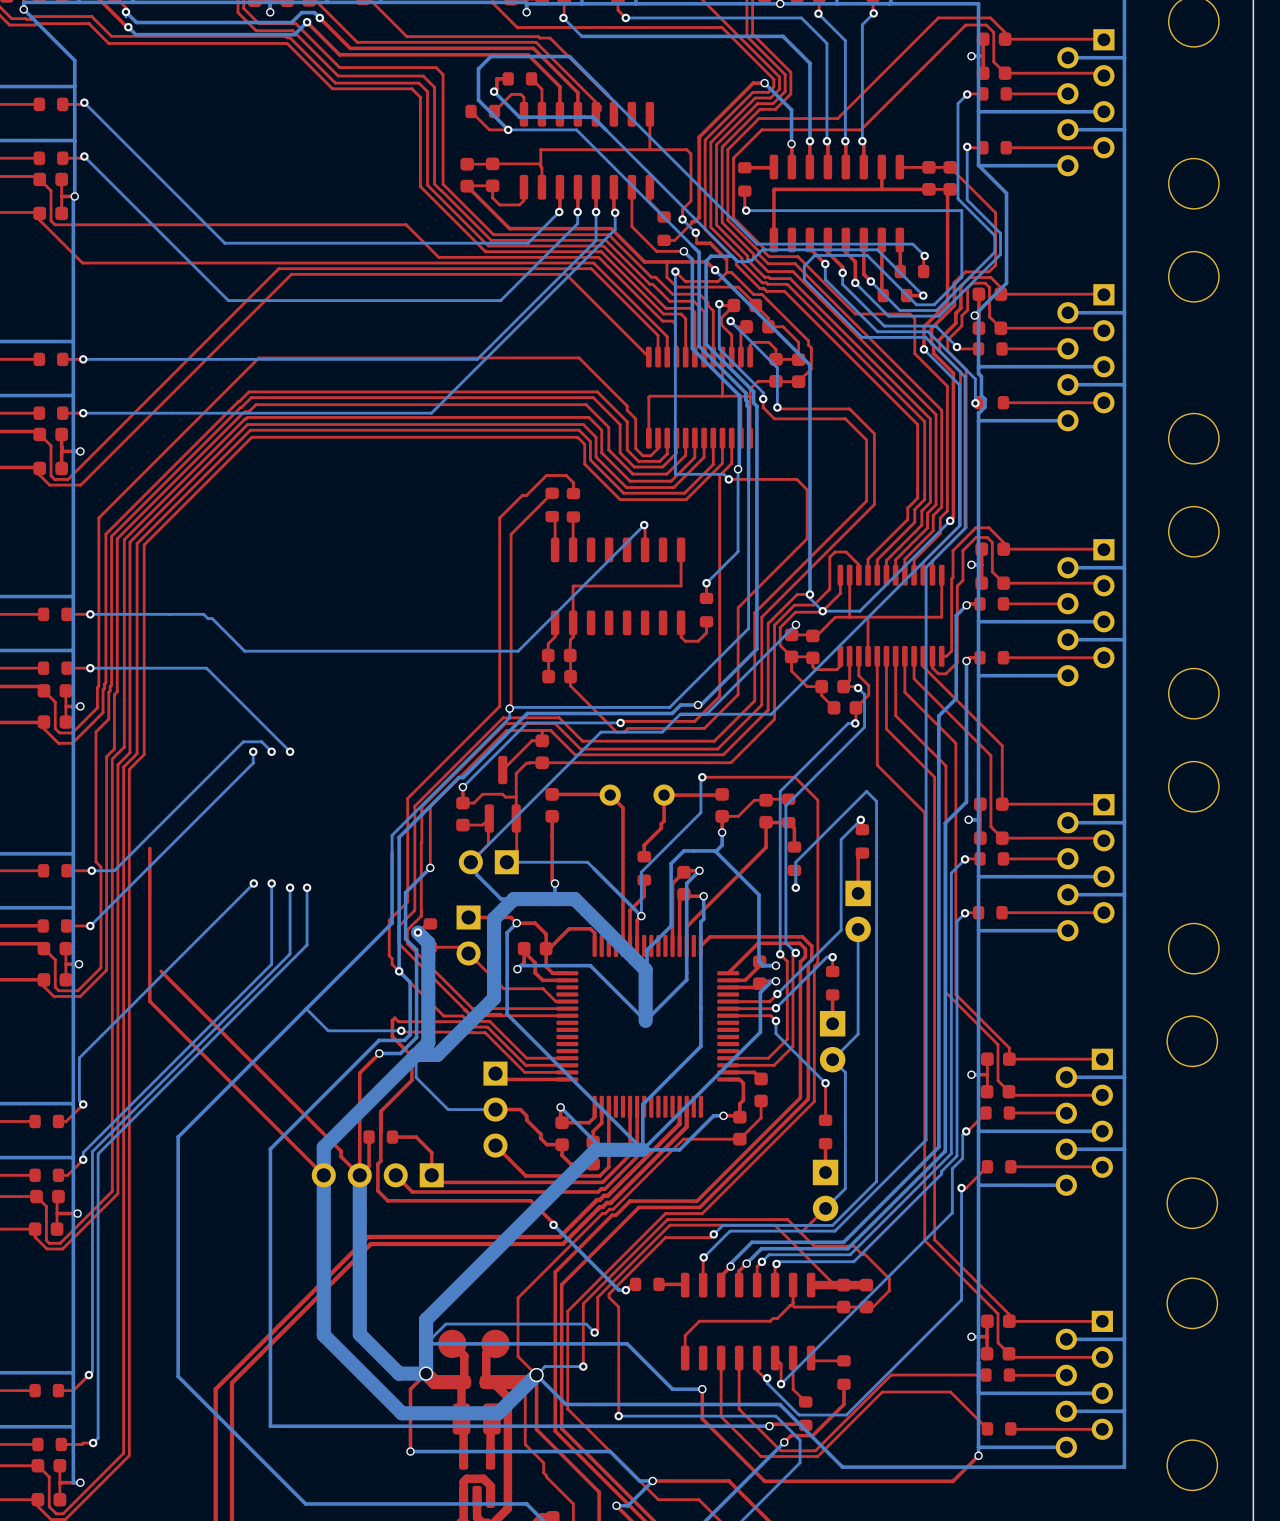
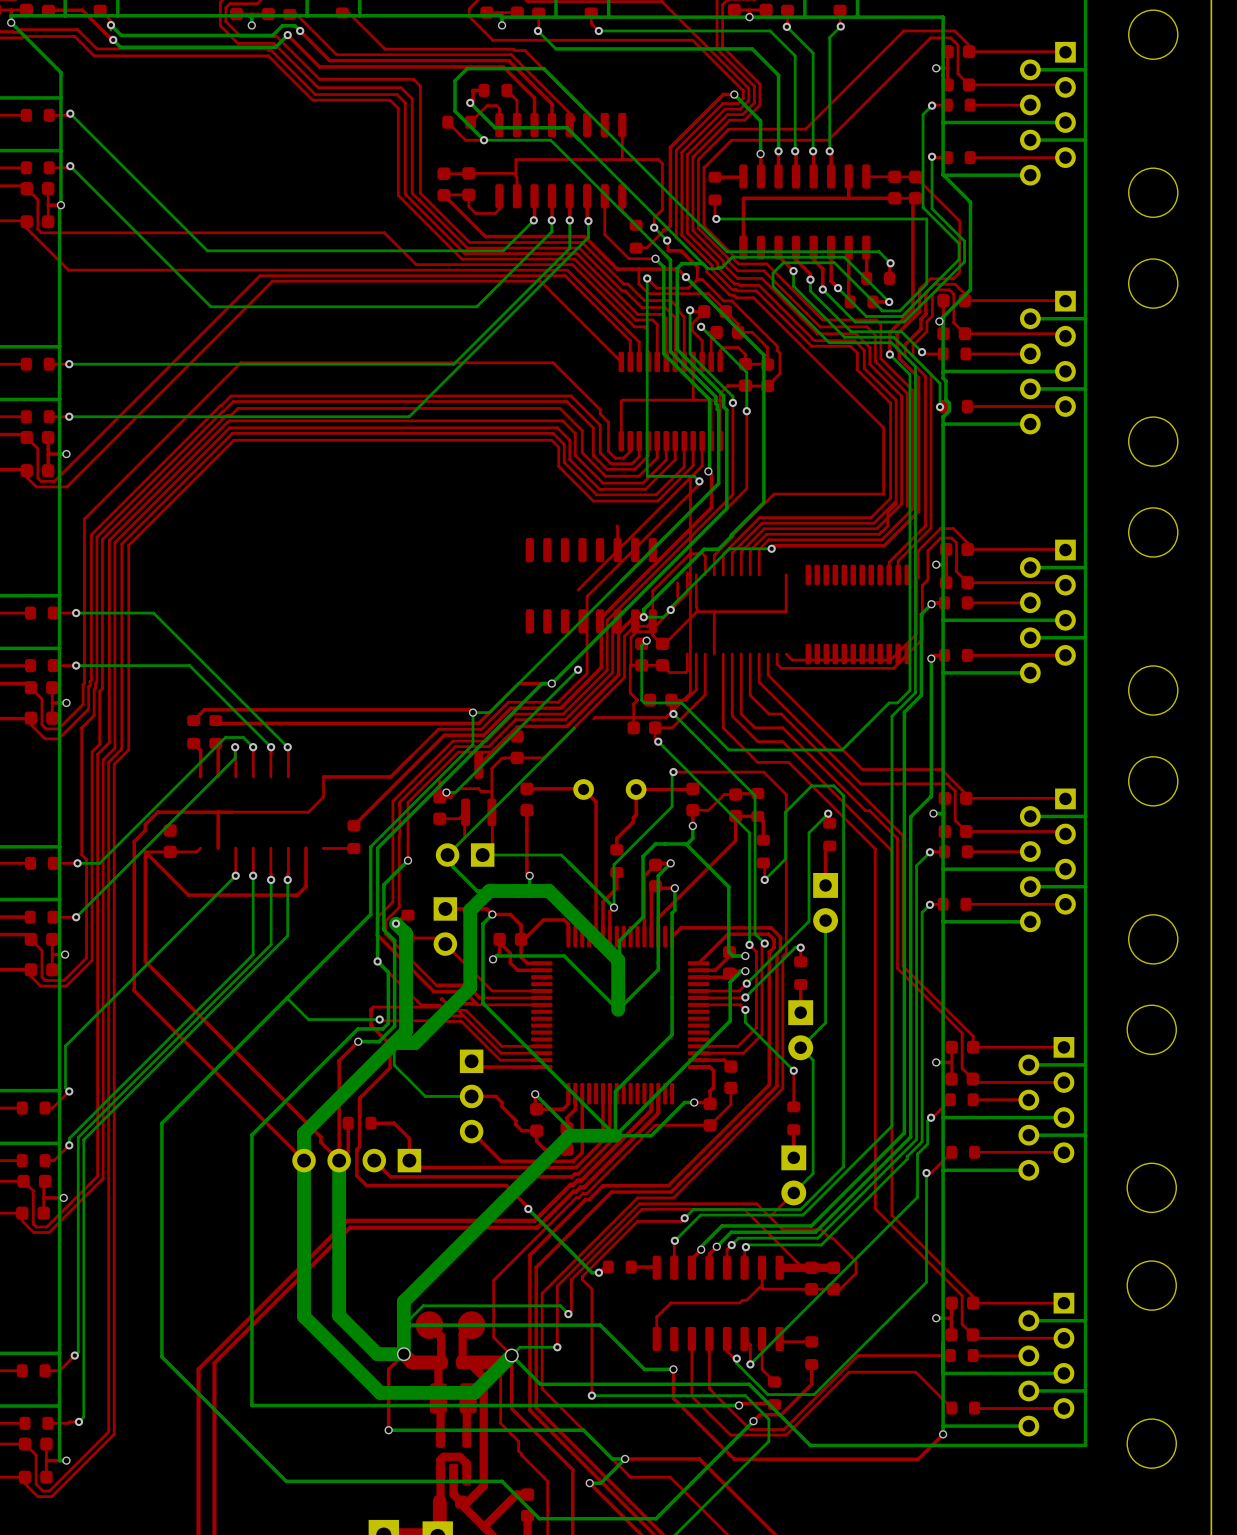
top track: (852, 321) (941, 410) -> (820, 326) (867, 326) (875, 335) (875, 361) (907, 393) (907, 413)
top track: (849, 328) (936, 414) -> (817, 333) (856, 333) (869, 347) (869, 364) (901, 395) (901, 418)
top track: (846, 335) (930, 418) -> (814, 340) (854, 340) (864, 350) (864, 368) (896, 400) (896, 422)
top track: (843, 340) (924, 421) -> (811, 346) (850, 346) (857, 353) (857, 369) (890, 402) (890, 425)
bottom track: (794, 349) (809, 365) (809, 598) (822, 611) (859, 611) (950, 520) -> (763, 355) (763, 502) (718, 549) (704, 549) (643, 609) (643, 617) (663, 617) (670, 607) (729, 548) (771, 548)
bottom track: (950, 361) (965, 376) (965, 528) (926, 567) (926, 720) -> (915, 366) (915, 692) (891, 716)
bottom track: (944, 369) (959, 384) (959, 526) (771, 714) (680, 714) (662, 732) (600, 732) -> (909, 374) (909, 690) (897, 702) (889, 702) (842, 749) (728, 749) (681, 702) (644, 702) (641, 700) (641, 645) (646, 640)
top track: (763, 407) (774, 418) (845, 418) (866, 440) (866, 501) (754, 612) (754, 700) (714, 741) (582, 741) (559, 717) -> (732, 411) (732, 494) (607, 620) (607, 670) (563, 714) (533, 714)
top track: (777, 407) (849, 408) (874, 433) (874, 504) (761, 617) (761, 705) (717, 749) (580, 749) (554, 723) -> (746, 411) (746, 488) (612, 622) (612, 672) (565, 719) (529, 719)
top track: none -> (708, 471) (711, 474) (711, 507) (601, 617) (601, 667) (560, 708) (511, 708) (484, 735) (444, 735) (353, 825)
bottom track: (738, 469) (738, 551) (706, 583) -> none
top track: (728, 479) (796, 479) (807, 489) (807, 538) (738, 607) (738, 694) (734, 697) -> (705, 654) (705, 694)
top track: none -> (702, 481) (587, 596) (587, 673) (558, 702) (508, 702) (481, 729) (438, 729) (390, 776) (323, 776) (323, 797) (308, 812) (231, 812)
bottom track: (748, 481) (748, 628) (669, 707) (510, 707) (509, 717) (392, 835) (392, 853) -> (718, 483) (489, 712) (473, 712) (473, 744) (370, 846)
top track: (917, 492) (917, 498) (907, 508) (907, 519) (868, 559) (868, 575) -> (883, 494) (773, 494) (714, 555) (714, 574)
top track: (552, 493) (511, 534) (509, 708) -> none
top track: (573, 493) (573, 482) (566, 475) (546, 475) (526, 495) (522, 495) (499, 518) (499, 706) (407, 798) (407, 901) (389, 920) (389, 955) (392, 958) (392, 964) (399, 971) -> none
top track: (924, 496) (924, 499) (914, 509) (914, 522) (877, 559) (877, 575) -> (890, 498) (871, 517) (759, 517) (723, 554) (723, 574)
top track: none -> (896, 501) (873, 523) (761, 523) (732, 552) (732, 574)
top track: (936, 502) (927, 513) (927, 527) (895, 559) (895, 575) -> (901, 503) (876, 528) (764, 528) (741, 551) (741, 574)
part: (552, 504) -> none
part: (573, 505) -> none
top track: (941, 505) (933, 515) (933, 530) (904, 559) (904, 575) -> none
bottom track: (756, 507) (756, 649) (700, 705) (680, 705) (672, 713) (527, 713) (463, 777) (458, 777) (399, 837) (399, 855) -> (726, 508) (551, 683) (542, 683) (377, 848)
top track: (947, 507) (947, 510) (940, 518) (940, 533) (914, 559) (914, 575) -> (912, 508) (881, 539) (768, 539) (759, 549) (759, 574)
top track: (953, 510) (953, 517) (950, 520) -> (918, 511) (884, 545) (774, 545) (771, 548)
top track: (552, 516) (555, 519) (555, 549) -> none
top track: (573, 516) (573, 549) -> none
via: (950, 520) -> none
bottom track: (644, 525) (518, 651) (244, 651) (212, 618) (207, 618) (203, 614) (169, 614) -> (287, 747) (153, 613)
via: (644, 525) -> none
top track: (916, 530) (886, 560) (886, 575) -> (882, 531) (879, 534) (766, 534) (750, 550) (750, 574)
via: none -> (771, 548)
top track: (681, 549) (681, 586) (573, 586) (570, 685) (616, 732) (624, 732) (628, 728) (704, 728) -> (658, 741) (655, 738) (655, 727) (672, 727) (675, 724)
top track: none -> (687, 572) (687, 593) (649, 631) (636, 631) (630, 637) (630, 665)
top track: none -> (696, 574) (696, 611)
top track: none -> (786, 574) (785, 611) (696, 611)
top track: (840, 575) (840, 593) (821, 612) (795, 612) (780, 627) (780, 645) (791, 656) -> none
top track: (849, 575) (849, 617) -> none
top track: (858, 575) (858, 564) (846, 552) (834, 552) (829, 557) (829, 589) (813, 605) (794, 605) (774, 625) (774, 719) (730, 762) (569, 762) -> (705, 574) (705, 556) (702, 553) (690, 553) (652, 590) (652, 620) (647, 626) (634, 626) (624, 636) (624, 677) (543, 757)
top track: (941, 575) (941, 617) (835, 617) (816, 635) (791, 634) (791, 629) (795, 624) -> none
via: (706, 583) -> none
top track: (809, 594) (797, 594) (768, 623) (768, 709) (723, 754) (575, 754) (550, 730) -> (643, 617) (637, 613) (618, 632) (618, 674) (566, 726) (525, 726)
via: (809, 594) -> none
part: (706, 610) -> none
via: none -> (670, 609)
via: (822, 611) -> none
top track: none -> (714, 611) (714, 654)
top track: (868, 617) (868, 656) -> none
via: none -> (643, 617)
top track: (706, 621) (706, 632) -> (696, 611) (677, 631)
top track: (555, 622) (555, 636) (548, 643) (548, 676) -> none
bottom track: (795, 624) (706, 714) -> none
via: (795, 624) -> none
top track: (951, 635) (951, 651) (946, 656) (941, 656) -> (916, 633) (890, 660) (792, 660) (786, 654)
top track: (957, 641) (957, 662) (945, 673) (938, 673) (932, 667) (932, 656) -> (922, 639) (893, 668) (781, 668) (777, 664) (777, 654)
via: none -> (646, 640)
part: (791, 645) -> none
part: (812, 646) -> none
part: (559, 655) -> none
part: none -> (641, 654)
part: none -> (662, 654)
top track: none -> (687, 654) (685, 672) (669, 672) (662, 665) (630, 665)
top track: none -> (696, 654) (696, 689) (685, 700) (671, 700) (671, 711) (673, 713)
top track: (791, 656) (791, 671) (807, 686) (821, 686) (821, 695) (834, 707) -> none
top track: (840, 656) (840, 666) (836, 669) (815, 669) (812, 666) (811, 656) (791, 656) -> none
top track: (849, 656) (849, 680) (843, 686) (858, 688) -> none
top track: (858, 656) (858, 675) (868, 685) (868, 695) (856, 707) (855, 723) -> none
top track: (877, 656) (877, 765) (924, 812) (924, 1240) -> (723, 654) (723, 727) (757, 762) (788, 762) (875, 849) (875, 1208) (890, 1224)
top track: (886, 656) (886, 729) (934, 777) (934, 1239) -> (732, 654) (732, 716) (757, 741) (782, 741) (891, 850) (891, 1215) (900, 1223)
top track: (895, 656) (895, 715) (945, 765) (945, 992) -> (741, 654) (741, 713) (755, 727) (782, 727) (865, 810) (869, 810) (897, 838) (897, 968) (911, 982)
top track: (904, 656) (904, 692) (955, 743) (955, 994) -> (750, 654) (750, 695) (768, 713) (781, 713) (903, 835) (903, 966) (920, 984)
top track: (914, 656) (914, 678) (990, 755) (990, 796) -> (759, 654) (759, 682) (860, 783) (947, 783) (955, 791)
top track: (923, 656) (923, 666) (1002, 745) (1002, 800) -> (768, 654) (768, 675) (862, 769) (941, 769) (966, 794)
top track: none -> (630, 665) (630, 692) (637, 700) (633, 704) (633, 727)
bottom track: none -> (578, 669) (455, 792) (446, 792)
via: none -> (578, 669)
part: (559, 676) -> none
top track: none -> (551, 683) (518, 683) (478, 723) (218, 723) (215, 720)
via: none -> (551, 683)
part: (832, 686) -> none
bottom track: (858, 688) (864, 694) (864, 727) (785, 805) -> (673, 713) (755, 795) (755, 799)
via: (858, 688) -> none
part: none -> (660, 700)
via: (698, 705) -> none
part: (845, 707) -> none
via position: (509, 708) -> (473, 712)
top track: none -> (473, 712) (470, 709) (204, 709) (193, 720)
top track: (538, 717) (503, 717) (414, 807) -> (513, 714) (486, 741) (453, 741) (392, 801)
via: none -> (673, 713)
bottom track: (620, 722) (527, 722) (462, 787) -> none
via: (620, 722) -> none
top track: (540, 723) (505, 723) (421, 808) -> (515, 719) (488, 746) (455, 746) (399, 802)
bottom track: (855, 723) (848, 723) (780, 791) (780, 839) -> (658, 741) (749, 832)
via: (855, 723) -> none
top track: (542, 730) (506, 730) (430, 808) -> (517, 726) (491, 752) (458, 752) (408, 802)
part: none -> (644, 727)
part: none -> (193, 731)
part: none -> (215, 731)
via: none -> (658, 741)
top track: none -> (193, 743) (200, 750) (200, 776)
top track: none -> (215, 743) (218, 745) (218, 776)
top track: none -> (253, 747) (253, 776)
top track: none -> (271, 747) (270, 776)
top track: none -> (287, 747) (288, 776)
via: none -> (287, 747)
top track: none -> (235, 750) (235, 776)
via position: (462, 787) -> (446, 792)
bottom track: (866, 791) (795, 862) (795, 887) -> (833, 785) (811, 785) (785, 812) (785, 859) (764, 879)
top track: none -> (218, 812) (218, 848) (218, 823)
top track: none -> (232, 812) (157, 812) (145, 824) (145, 830) (134, 841)
part: none -> (353, 837)
part: none -> (170, 841)
top track: none -> (200, 848) (196, 851) (145, 851)
top track: none -> (235, 848) (235, 875)
top track: none -> (253, 848) (253, 875)
top track: none -> (270, 848) (271, 879)
top track: none -> (288, 848) (287, 879)
top track: none -> (305, 848) (305, 886) (297, 895) (188, 895) (145, 851)
top track: none -> (323, 848) (353, 848)
top track: none -> (145, 851) (145, 961)
top track: (398, 943) (471, 1015) (501, 1015) -> (377, 934) (433, 991) (464, 991) (476, 1003)
top track: (503, 988) (543, 988) (555, 1001) -> (479, 978) (492, 991) (530, 991)
top track: (459, 995) (472, 1008) (503, 1008) -> (436, 985) (466, 985) (479, 997)
top track: (394, 1018) (398, 1021) (460, 1021) (466, 1027) (471, 1027) -> (373, 1007) (455, 1007) (463, 1015)

